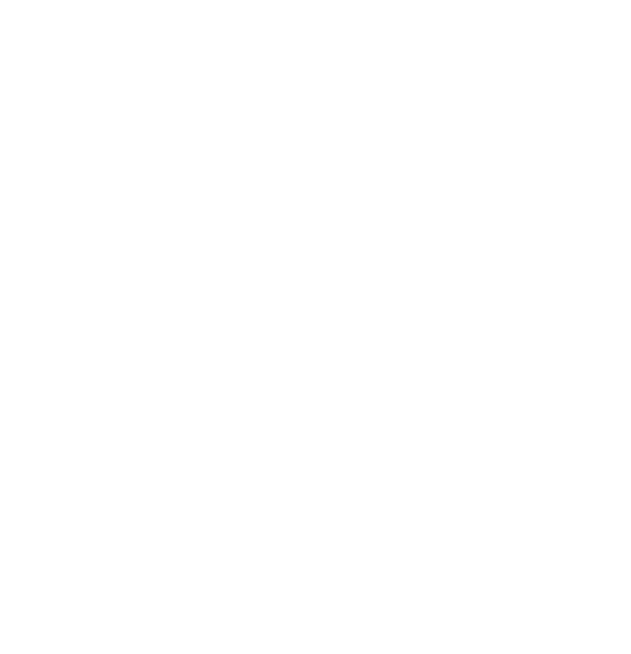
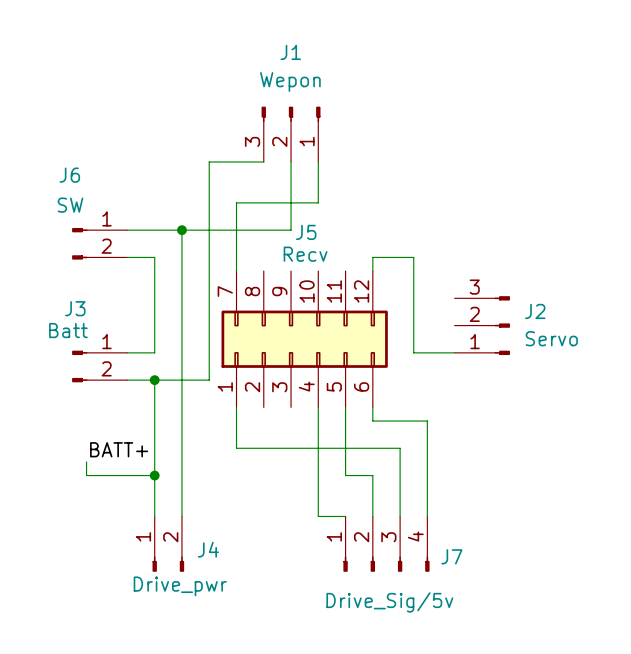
J1: none -> Wepon (291, 134)
wire: none -> (263, 162) (209, 162) (209, 380) (127, 380)
wire: none -> (291, 162) (291, 230) (127, 230)
wire: none -> (318, 162) (318, 202) (236, 202) (236, 271)
wire: none -> (181, 230) (181, 516)
junction: none -> (181, 230)
J6: none -> SW (99, 243)
wire: none -> (127, 257) (154, 257) (154, 352) (127, 352)
wire: none -> (372, 271) (372, 257) (413, 257) (413, 352) (454, 352)
J2: none -> Servo (482, 325)
J5: none -> Recv (304, 339)
J3: none -> Batt (99, 366)
wire: none -> (154, 380) (154, 516)
junction: none -> (154, 380)
wire: none -> (236, 407) (236, 448) (400, 448) (400, 516)
wire: none -> (318, 407) (318, 516) (345, 516)
wire: none -> (345, 407) (345, 475) (372, 475) (372, 516)
wire: none -> (372, 407) (372, 421) (427, 421) (427, 516)
label: none -> BATT+ (119, 449)
wire: none -> (86, 461) (86, 475) (154, 475)
junction: none -> (154, 475)
J4: none -> Drive_pwr (168, 544)
J7: none -> Drive_Sig/5v (386, 544)

